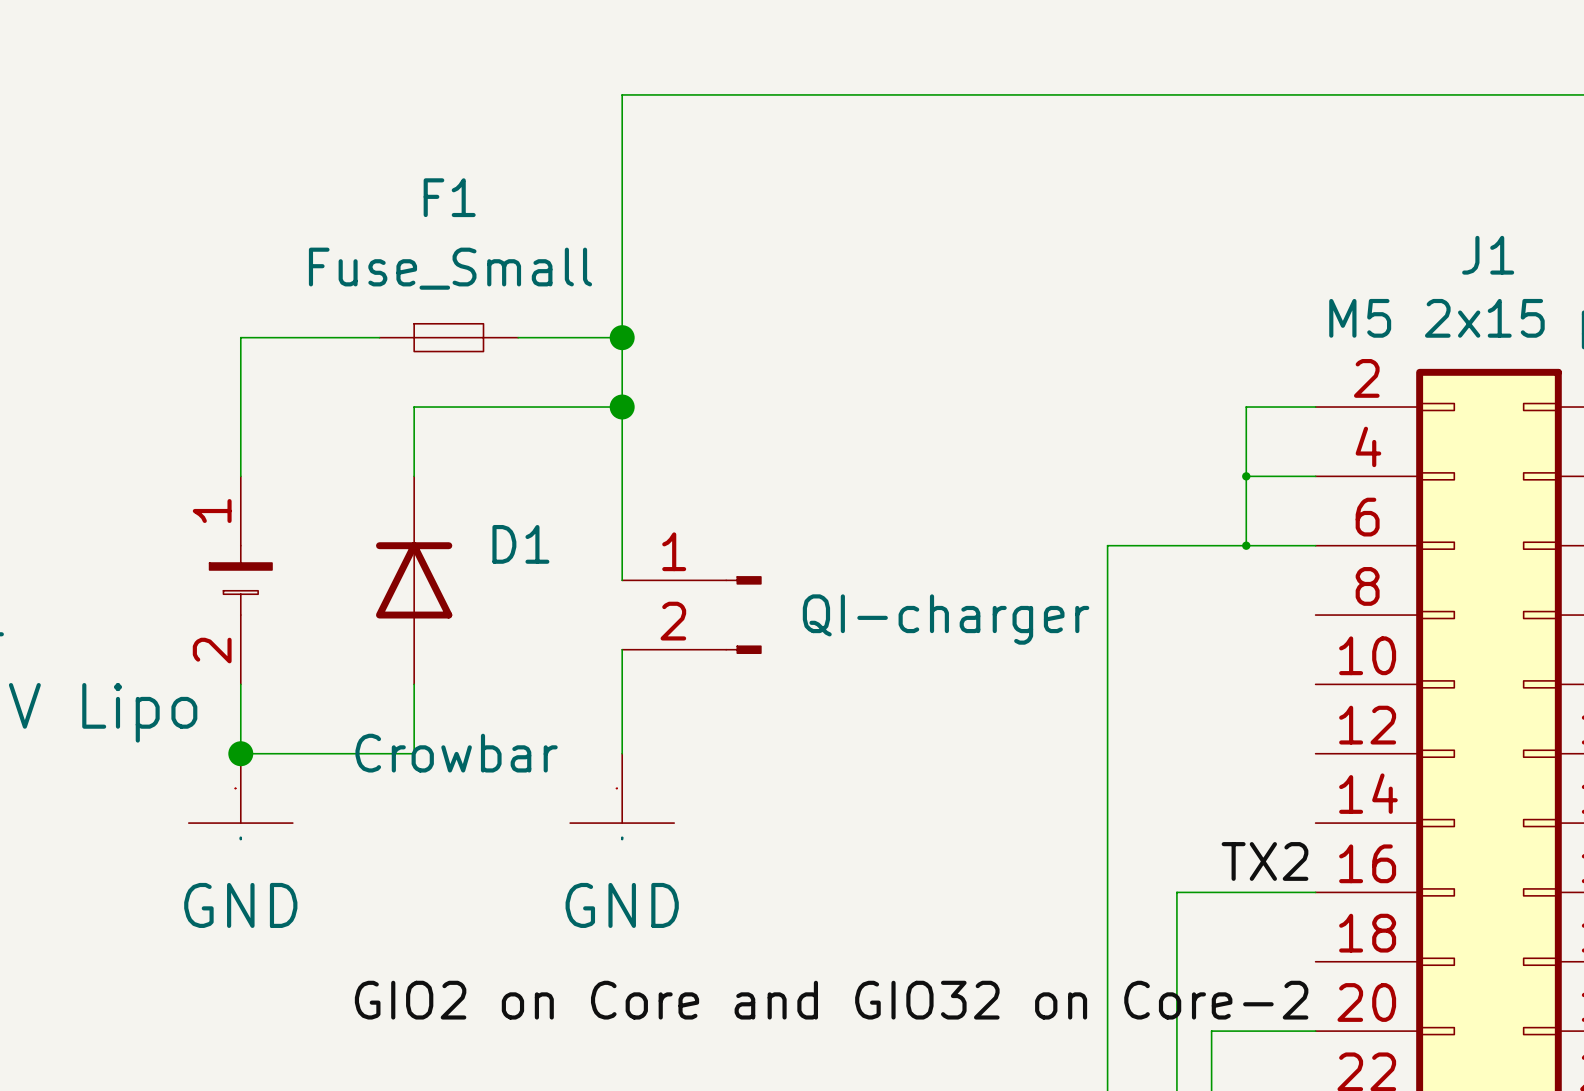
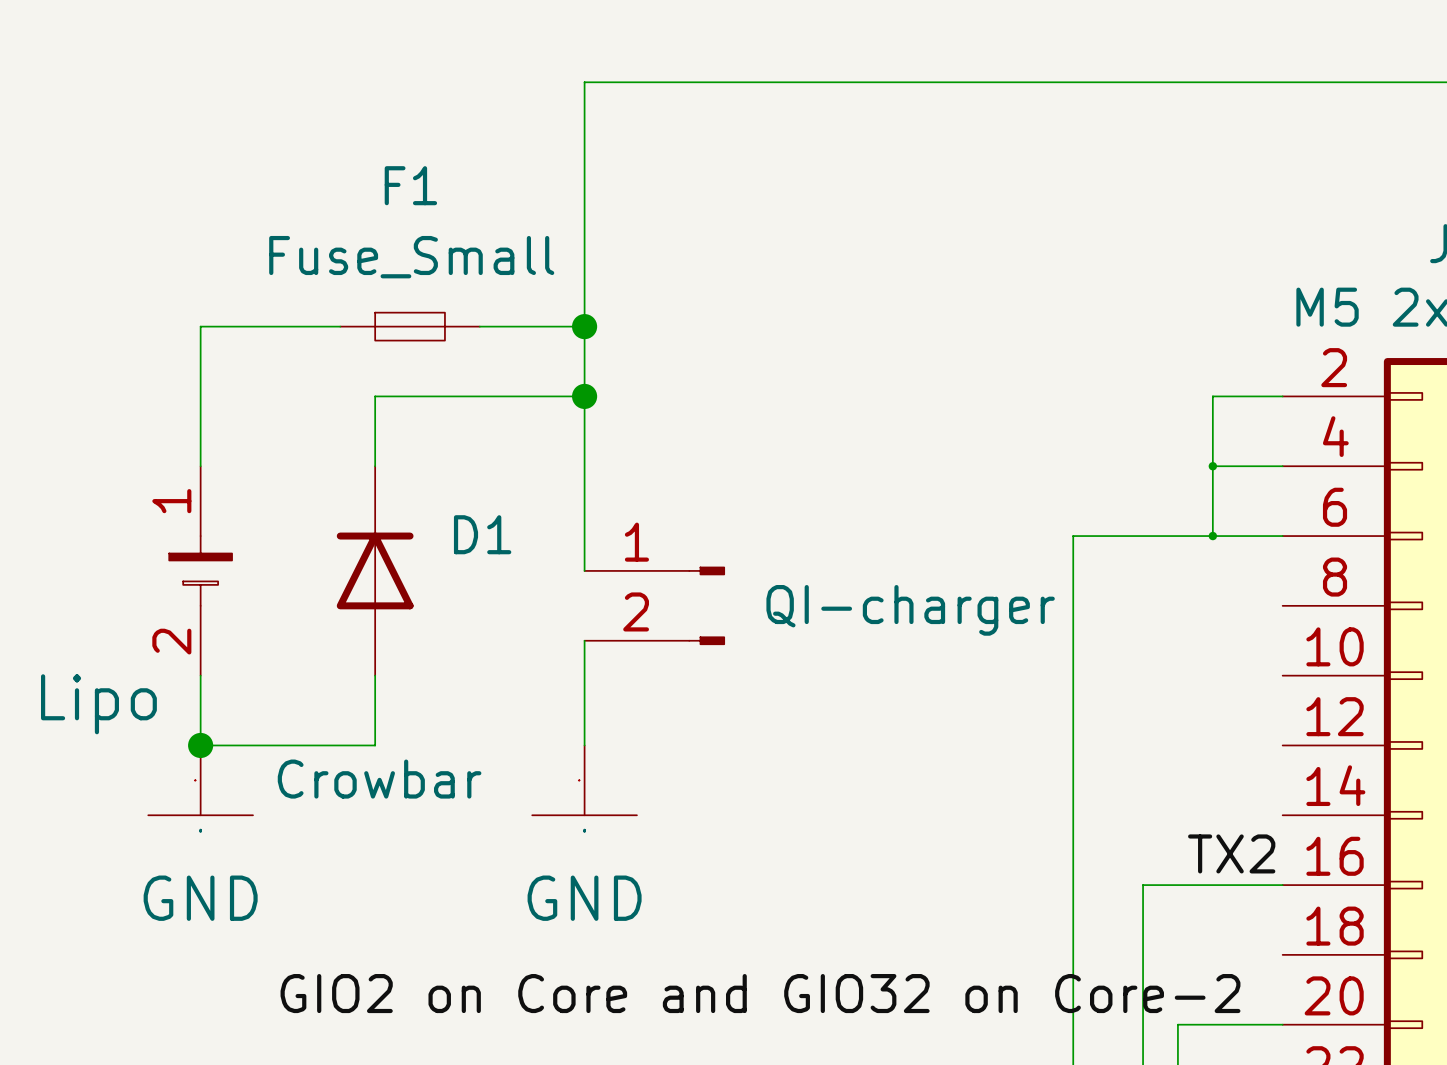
D1 value position: Crowbar (456, 753) -> Crowbar (379, 779)
label position: GIO2 on Core and GIO32 on Core-2 (831, 1000) -> GIO2 on Core and GIO32 on Core-2 (760, 993)

